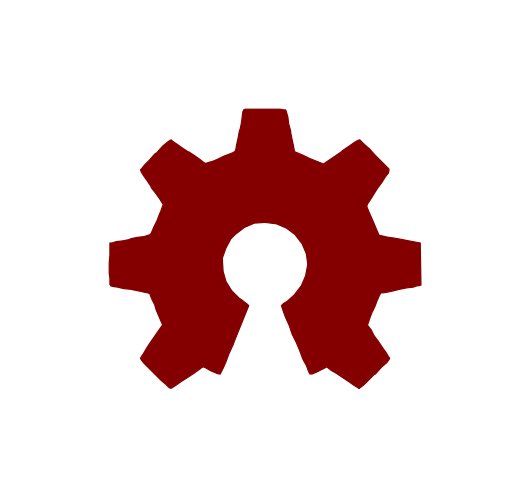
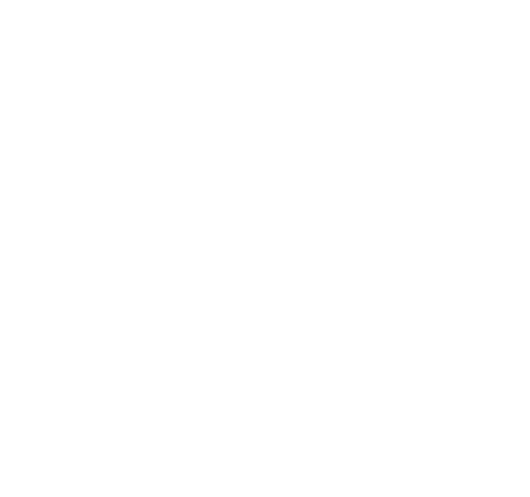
power symbol: (265, 248) -> none

